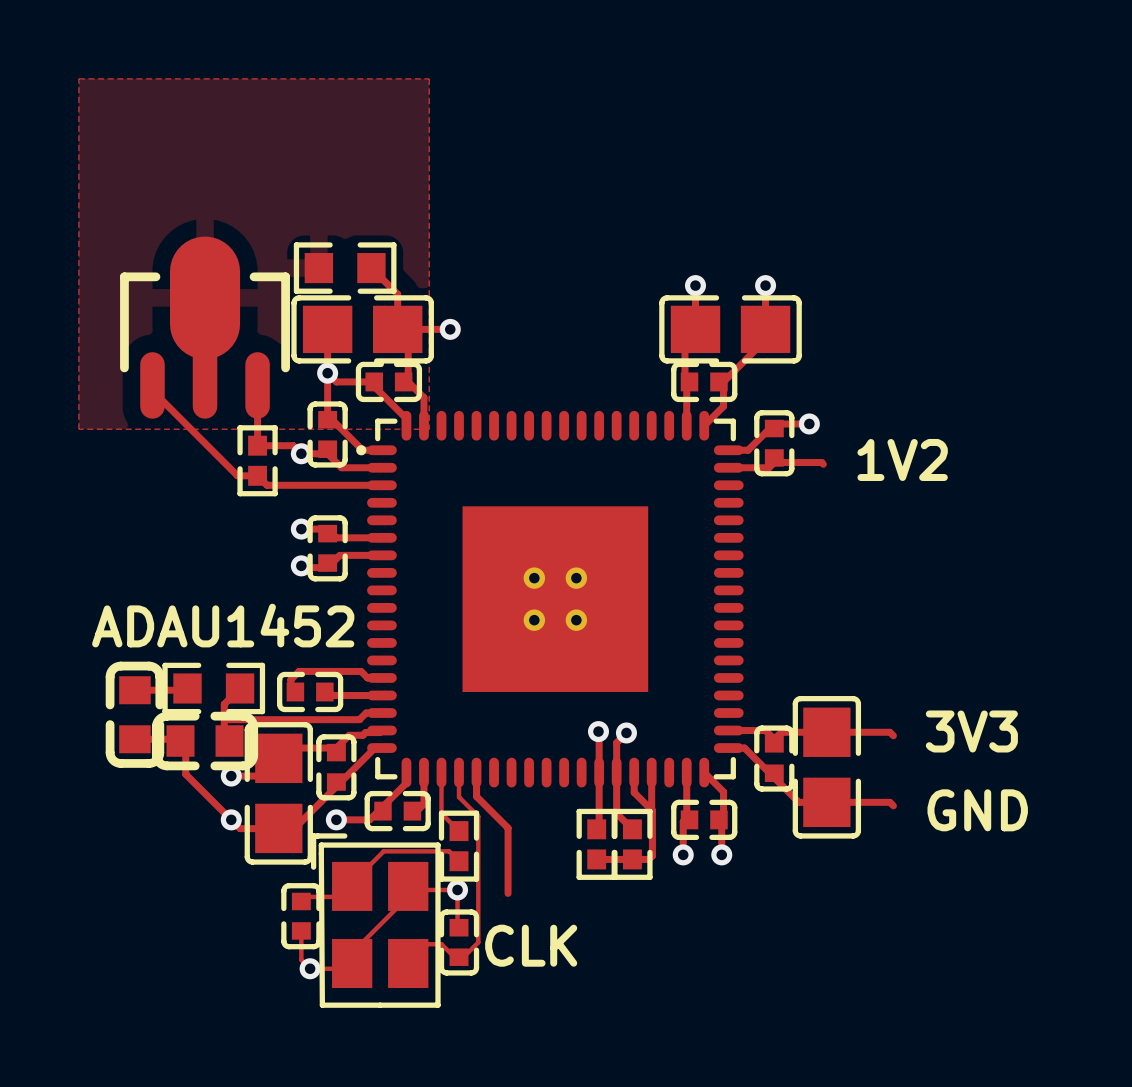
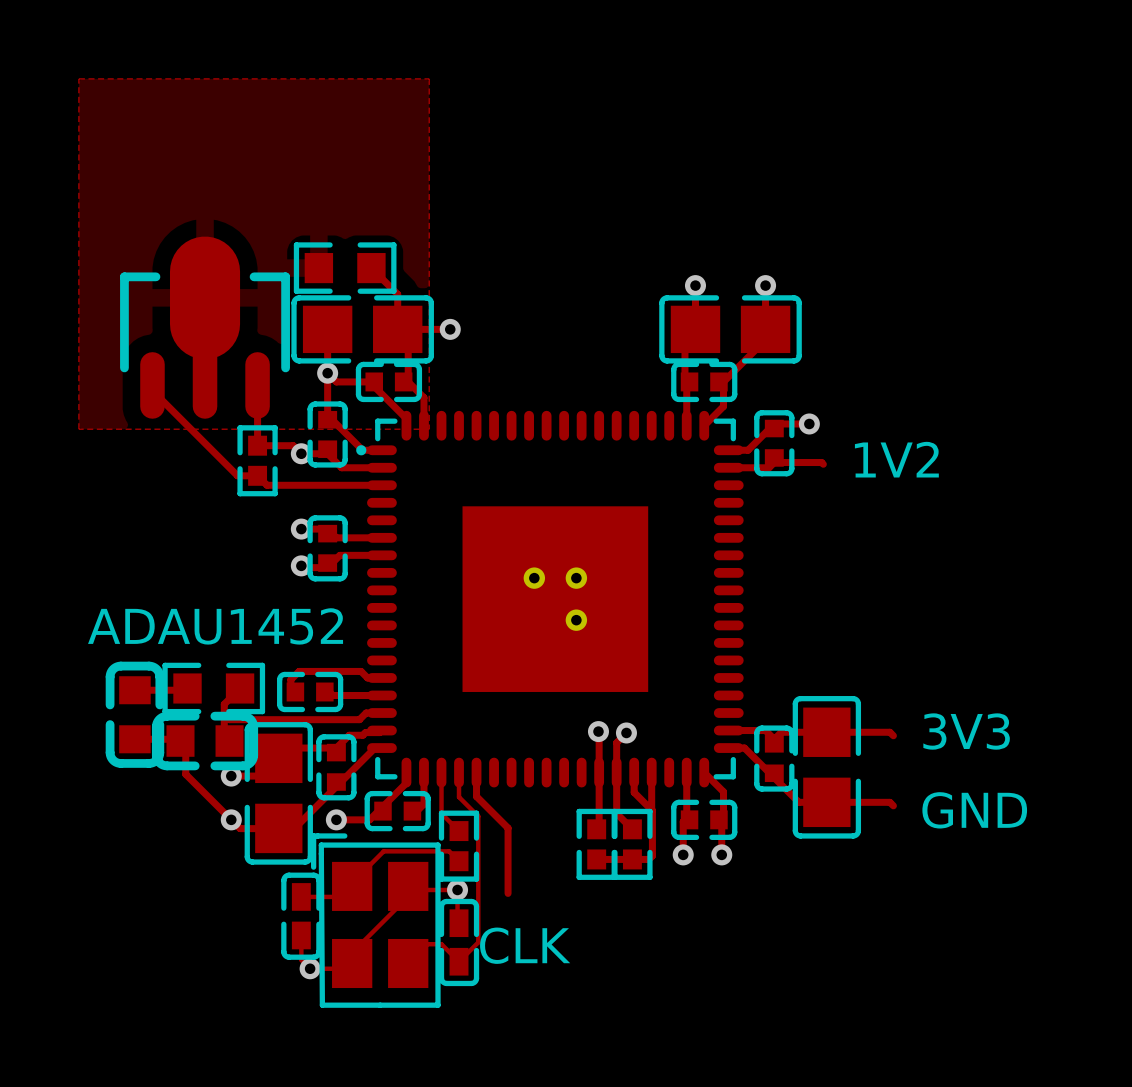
part footprint: [356, 410, 744, 788] -> [356, 410, 744, 788]
part footprint: [281, 883, 322, 950] -> [281, 872, 322, 960]
part footprint: [438, 909, 480, 976] -> [438, 898, 480, 987]

